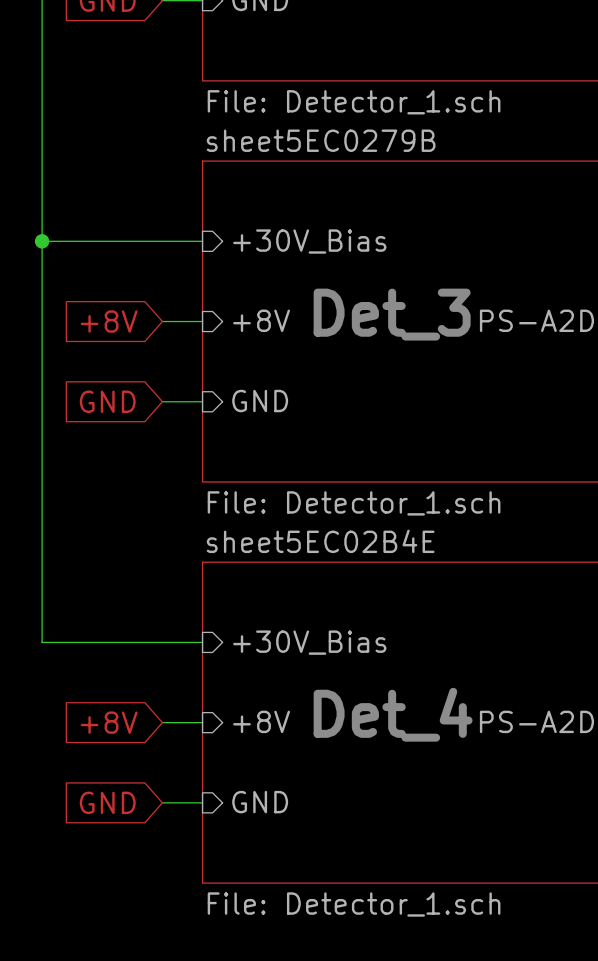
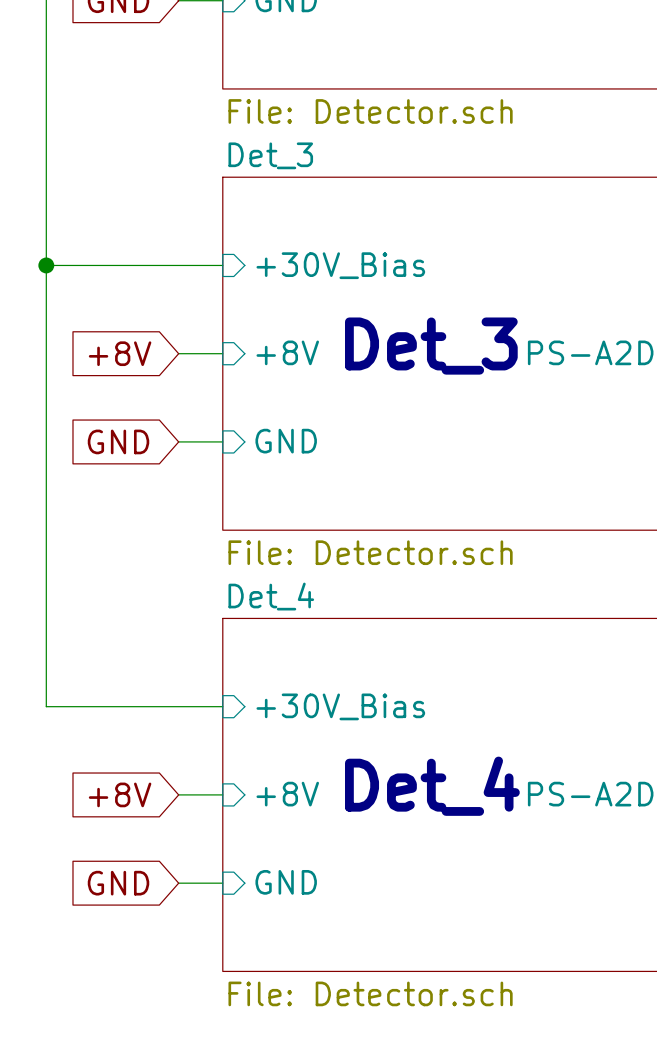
sheet value: File: Detector_1.sch (354, 102) -> File: Detector.sch (370, 111)
sheet sheet5EC0279B name: sheet5EC0279B (321, 140) -> Det_3 (270, 155)
sheet sheet5EC0279B value: File: Detector_1.sch (354, 503) -> File: Detector.sch (370, 552)
sheet sheet5EC02B4E name: sheet5EC02B4E (320, 541) -> Det_4 (271, 596)
sheet sheet5EC02B4E value: File: Detector_1.sch (354, 904) -> File: Detector.sch (370, 993)

